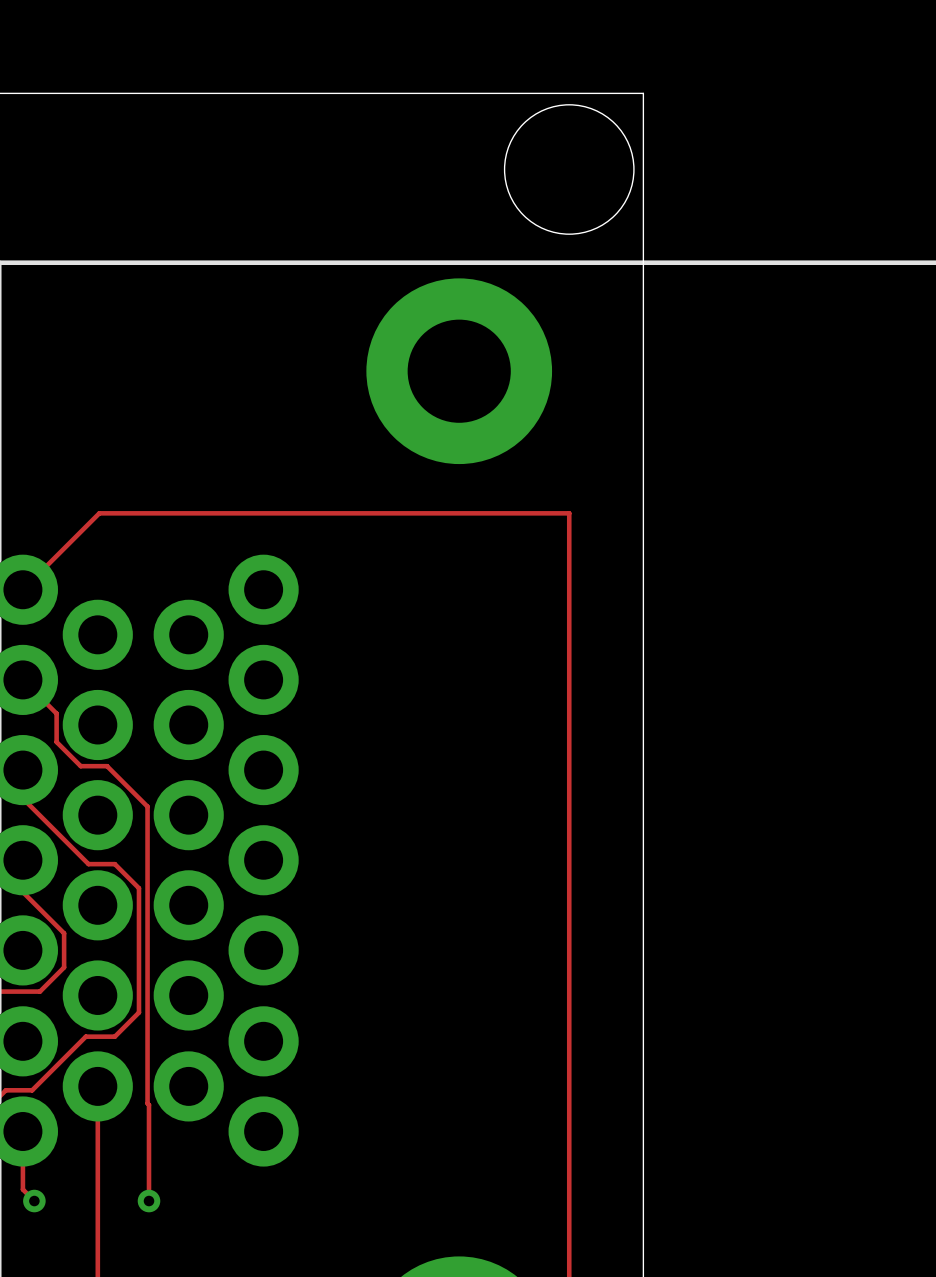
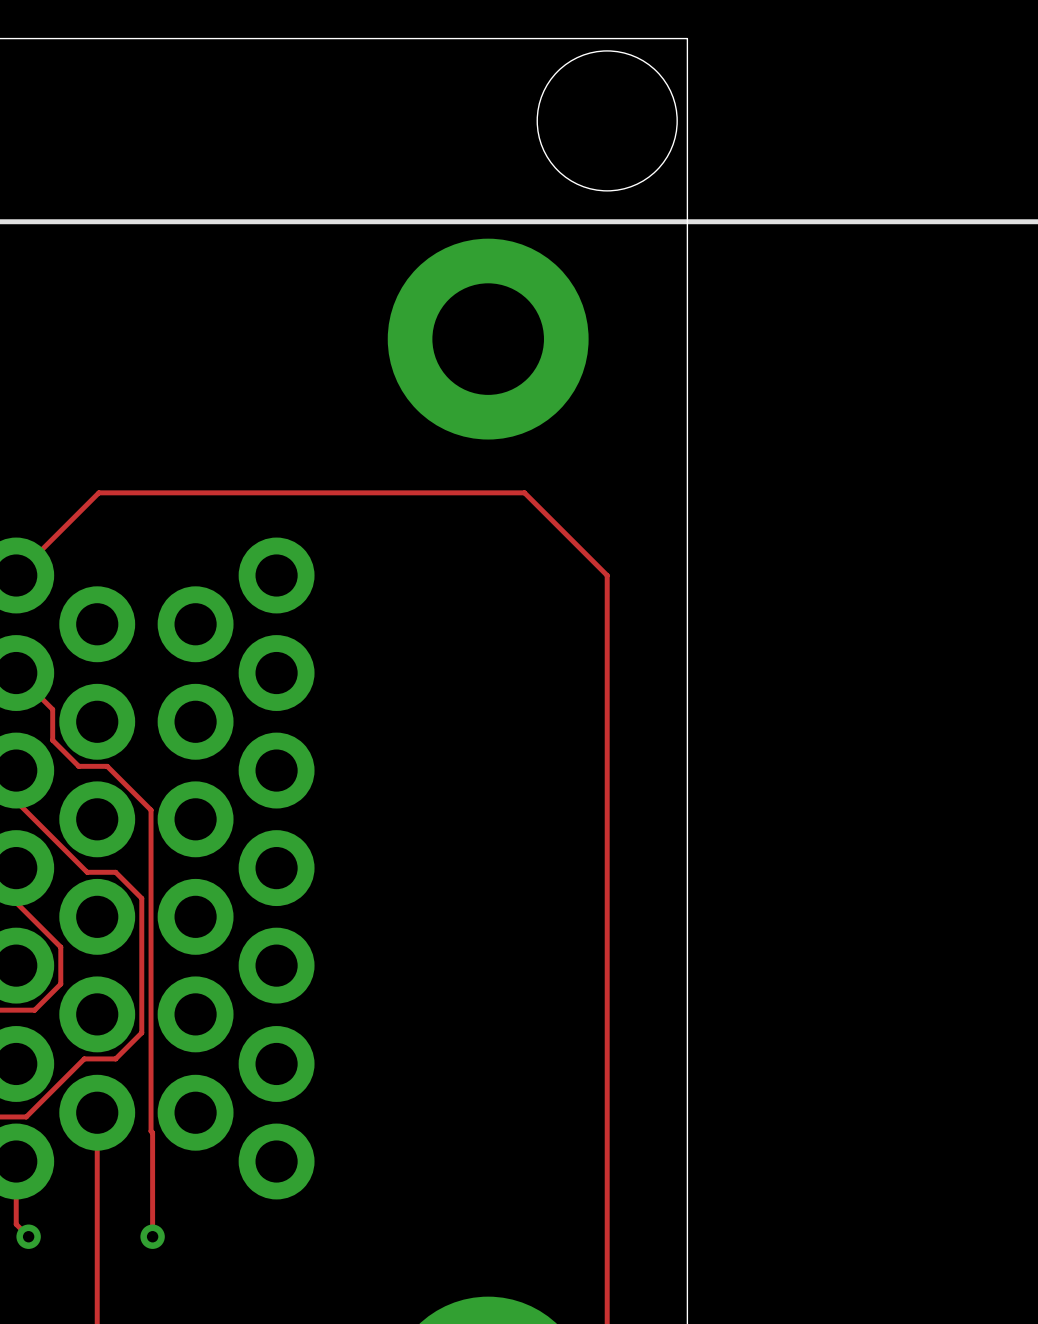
track: (492, 513) (569, 513) (569, 589) -> (524, 492) (607, 575)

